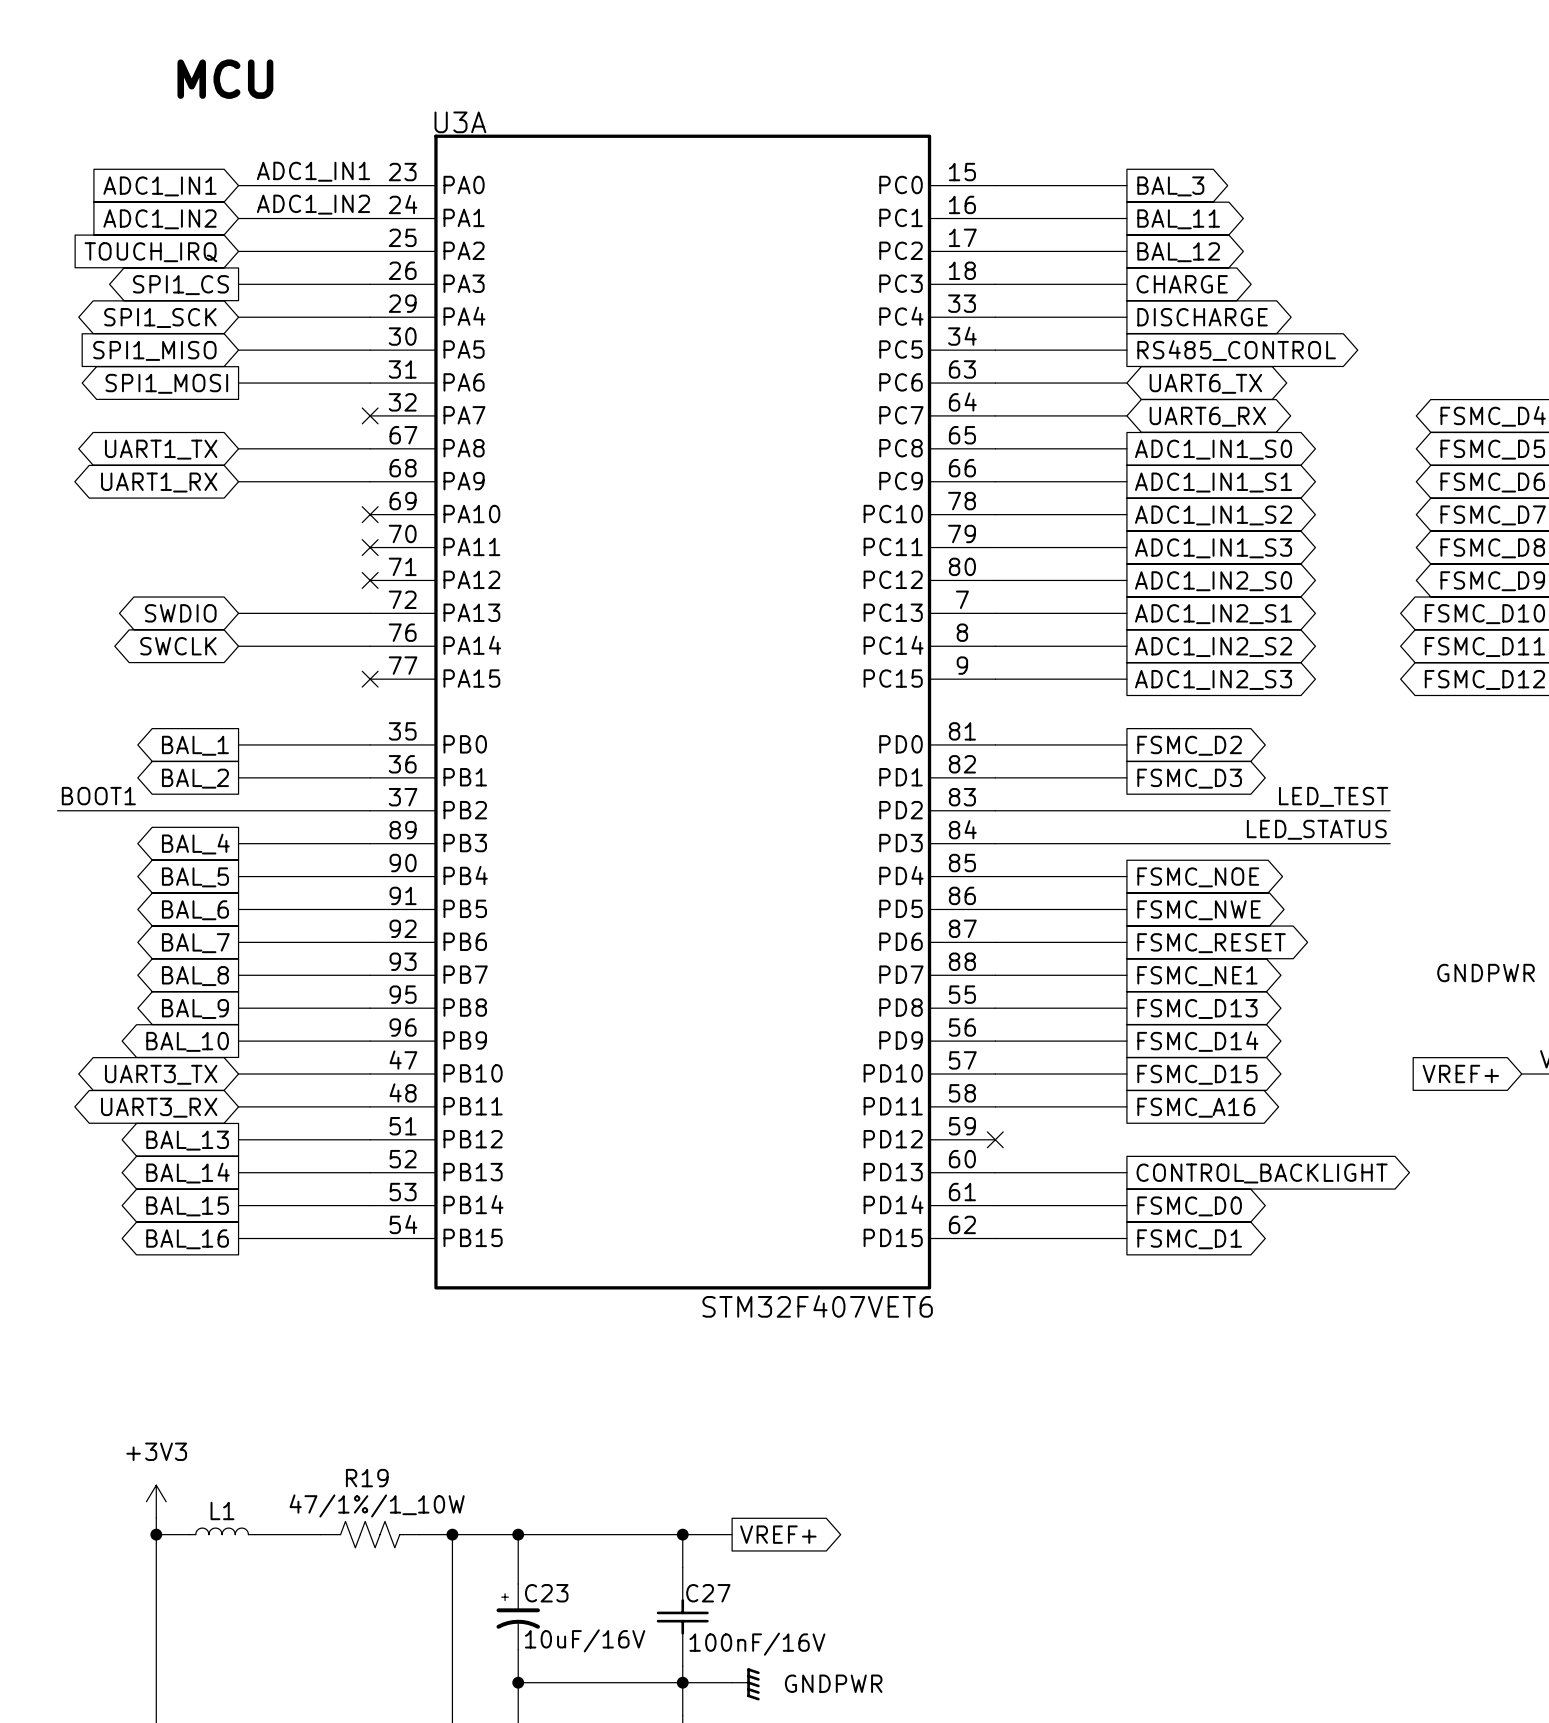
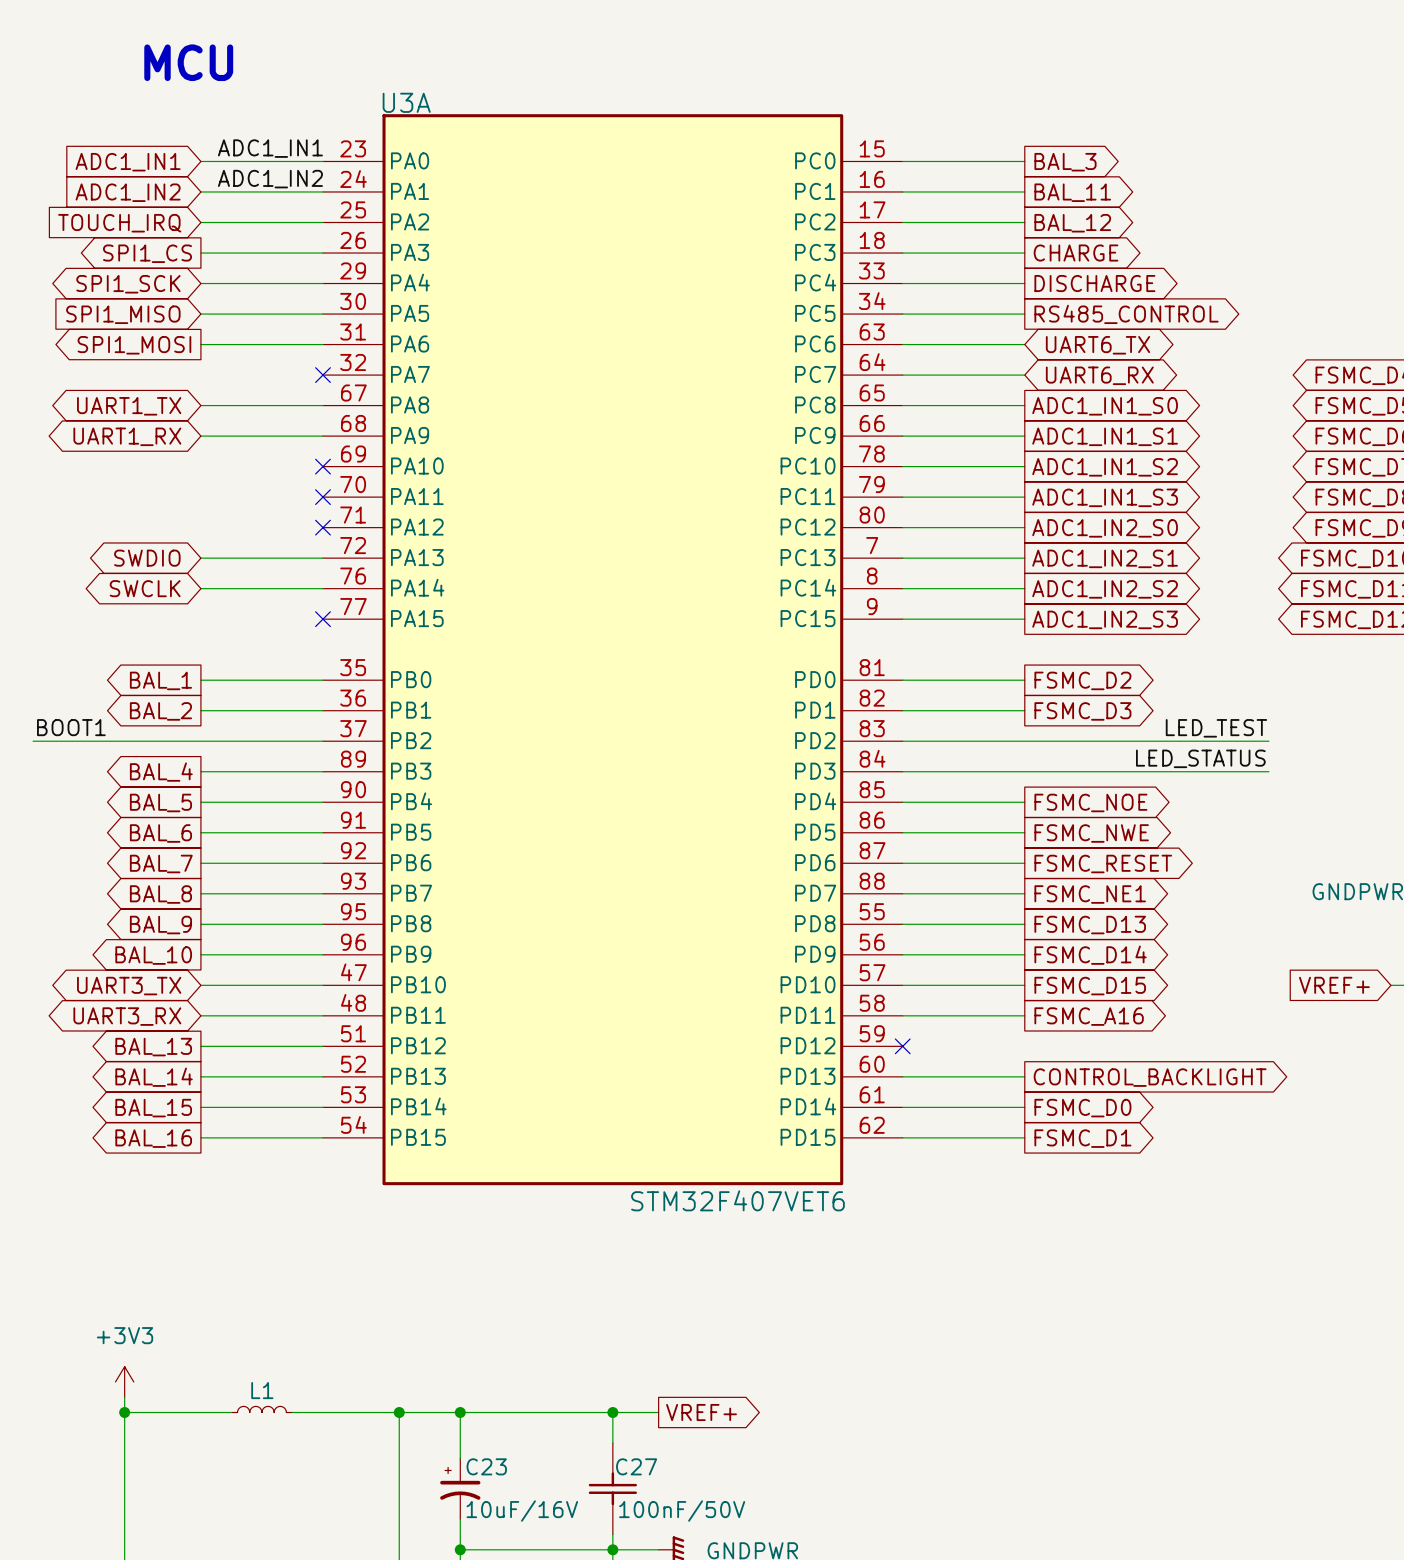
L1 position: (222, 1531) -> (261, 1409)
wire: none -> (155, 1412) (216, 1412)
wire: (271, 1534) (320, 1534) -> none
wire: none -> (292, 1412) (368, 1412)
R19: 47/1%/1_10W (370, 1534) -> none
C27 value: 100nF/16V (757, 1644) -> 100nF/50V (682, 1511)

